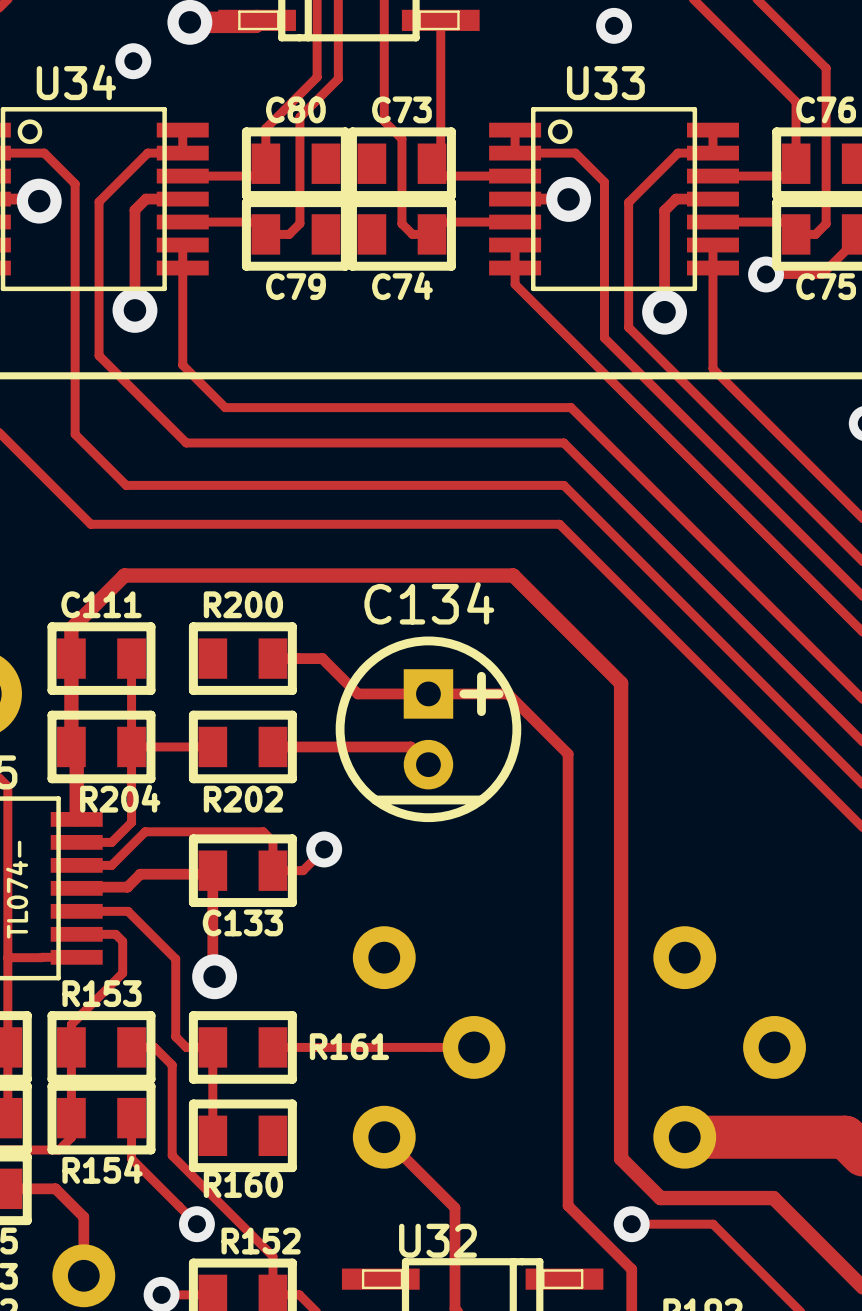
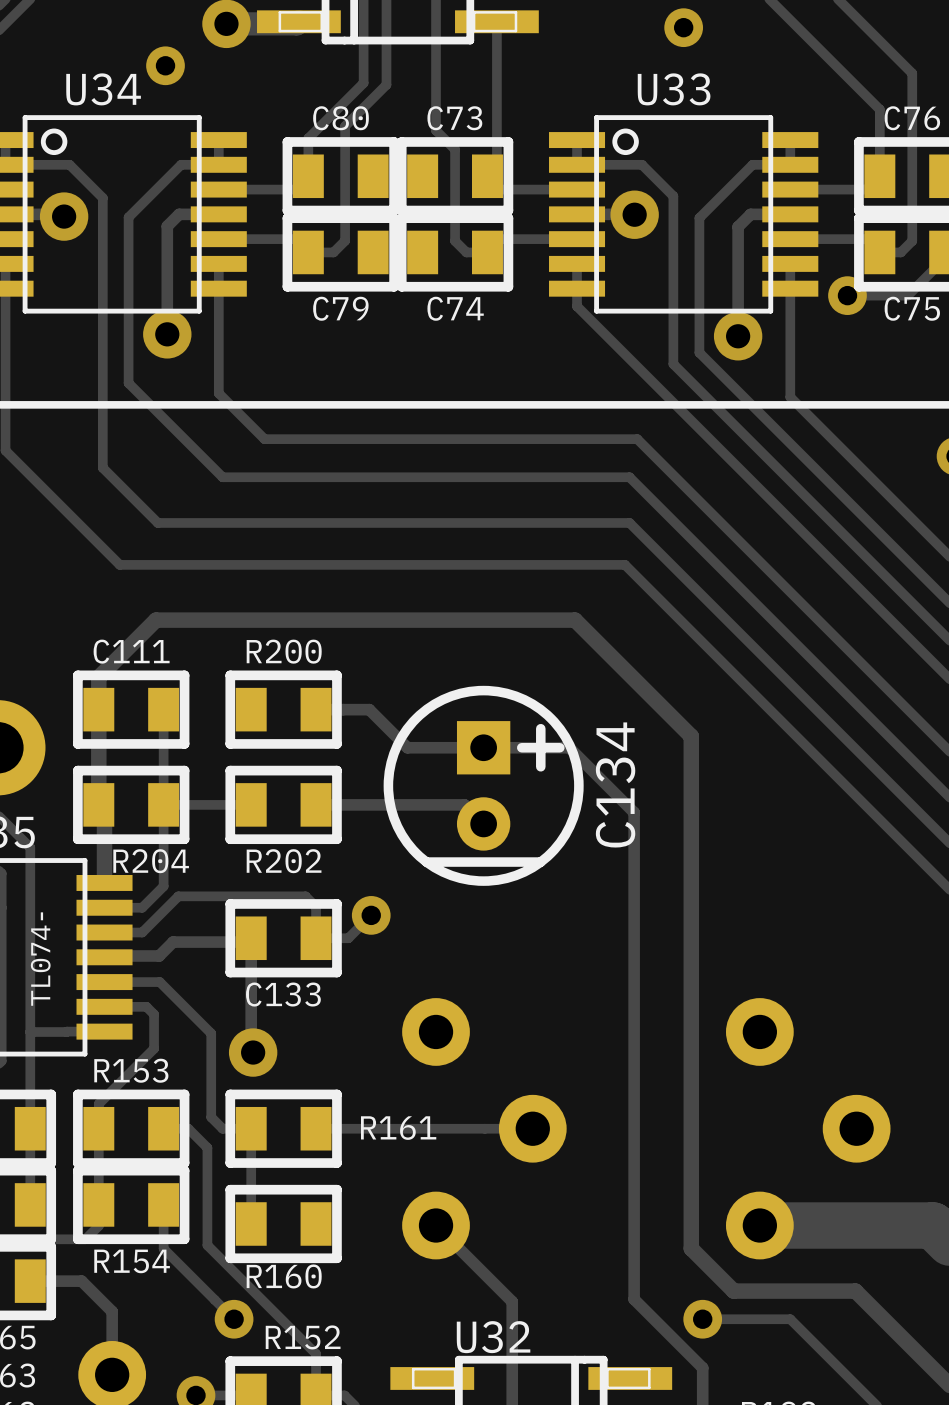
C134 name rotation: 0° (429, 603) -> 90° counterclockwise (615, 784)
C134 name position: C134 (429, 603) -> C134 (615, 784)

